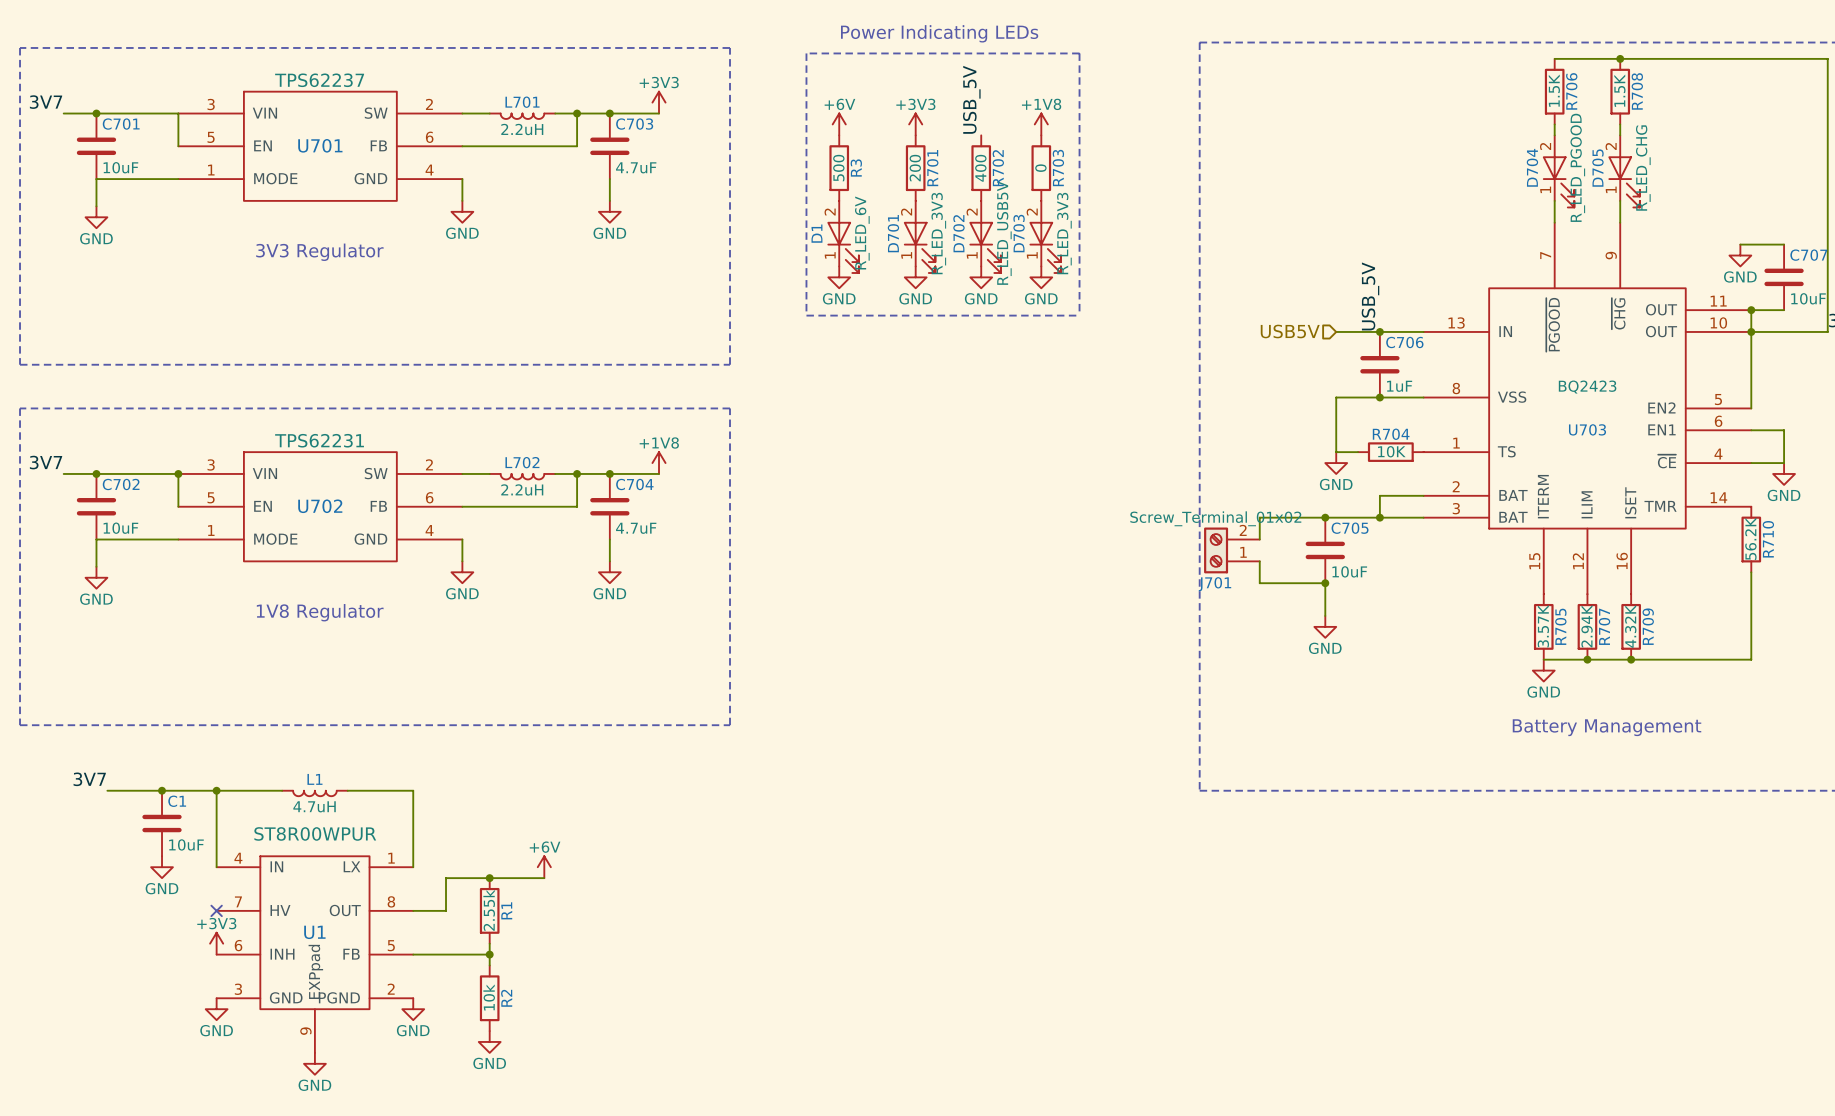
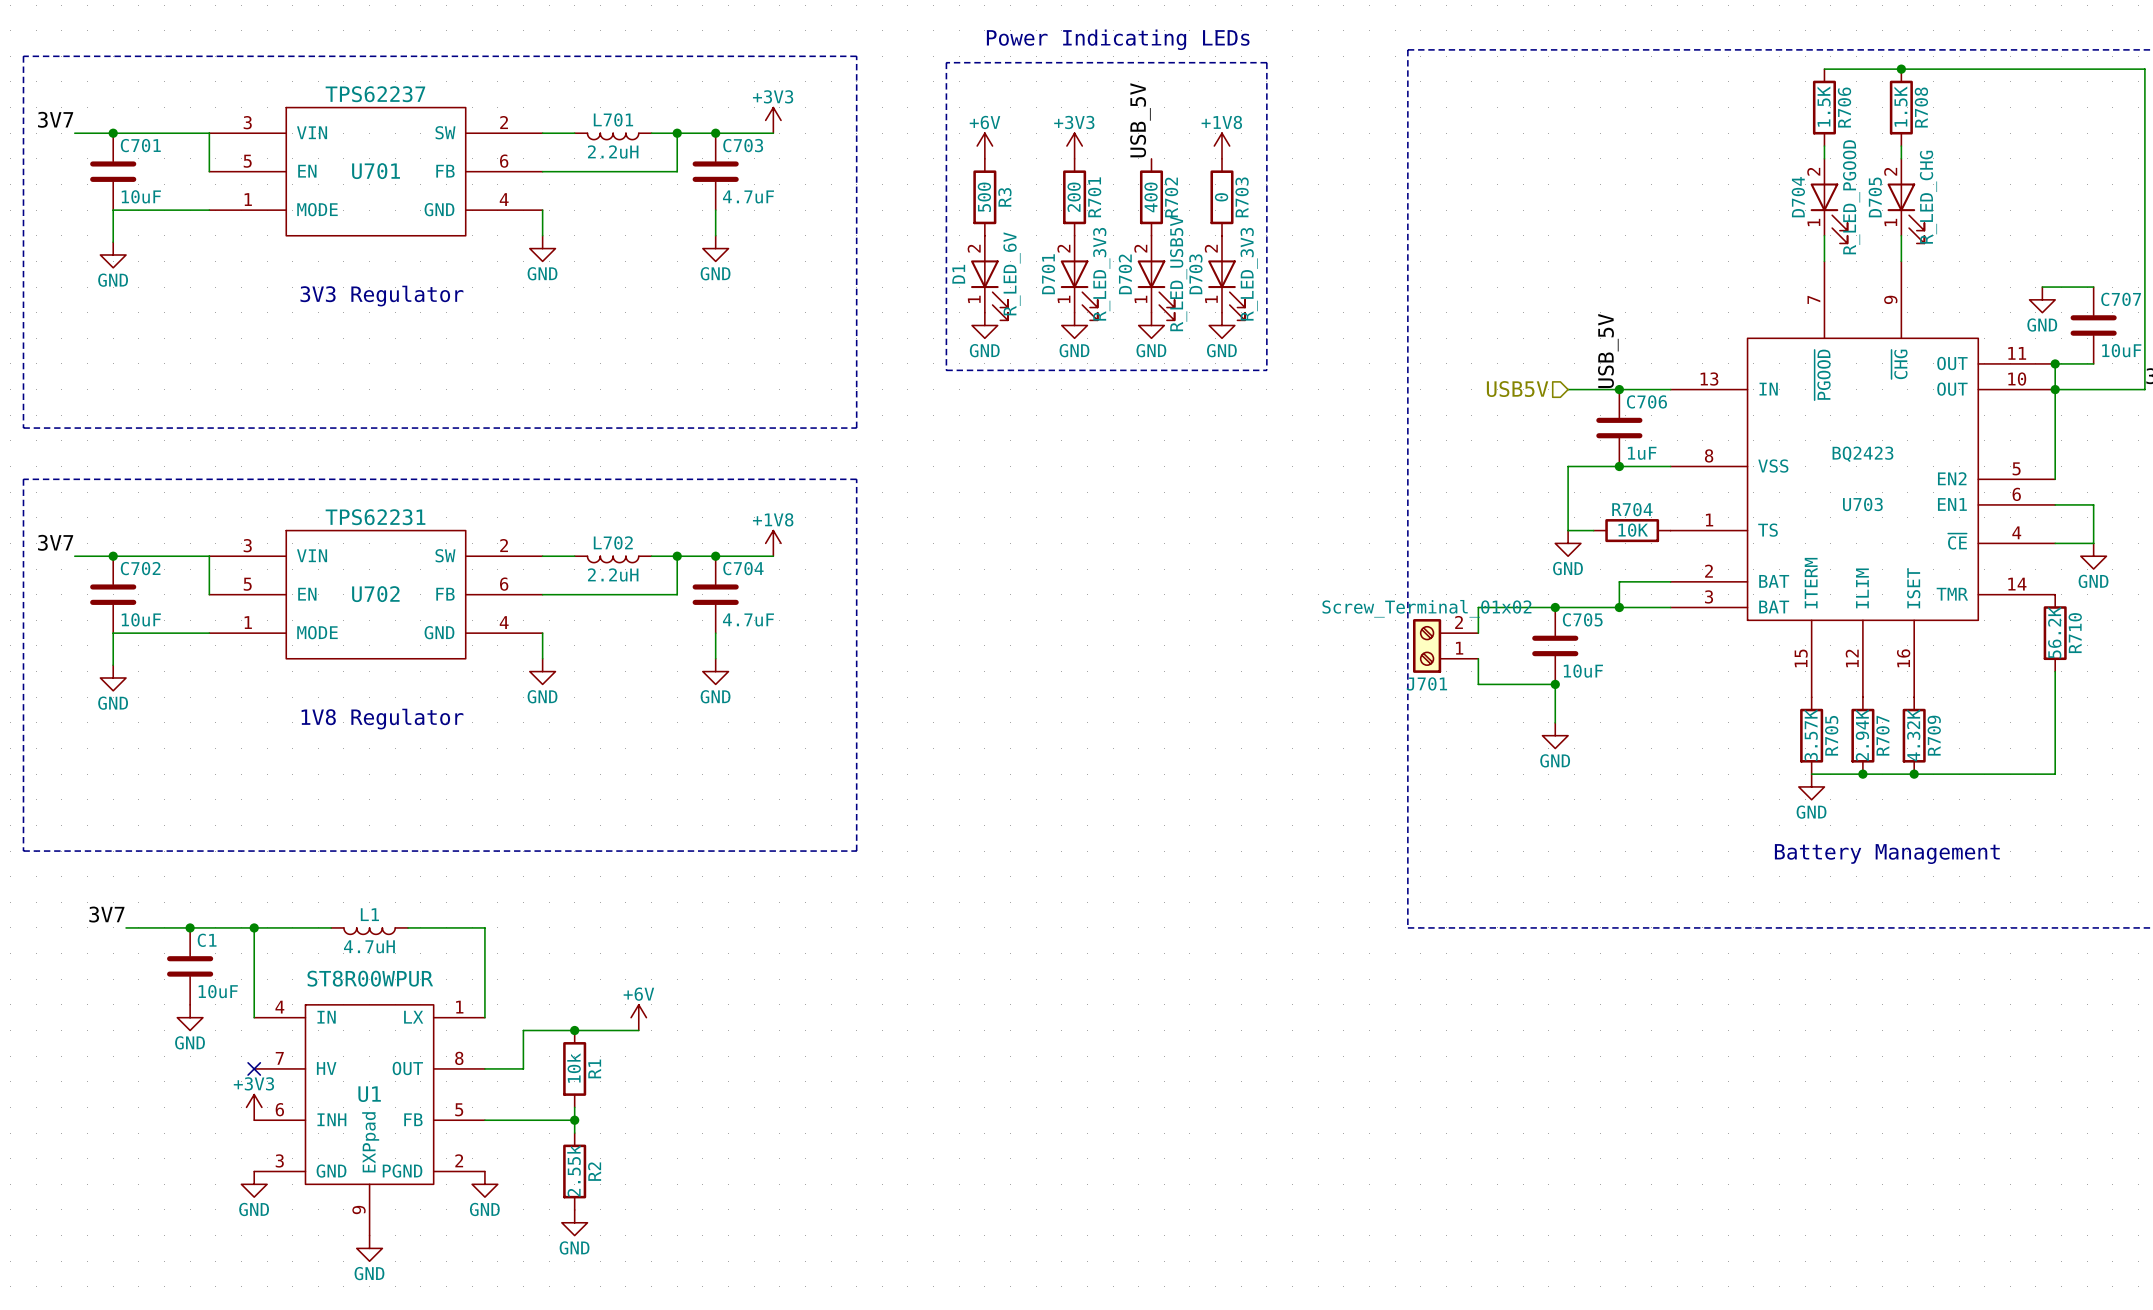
junction: (178, 473) -> none
R1 value: 2.55k (489, 910) -> 10k (574, 1068)
R2 value: 10k (489, 997) -> 2.55k (574, 1170)

